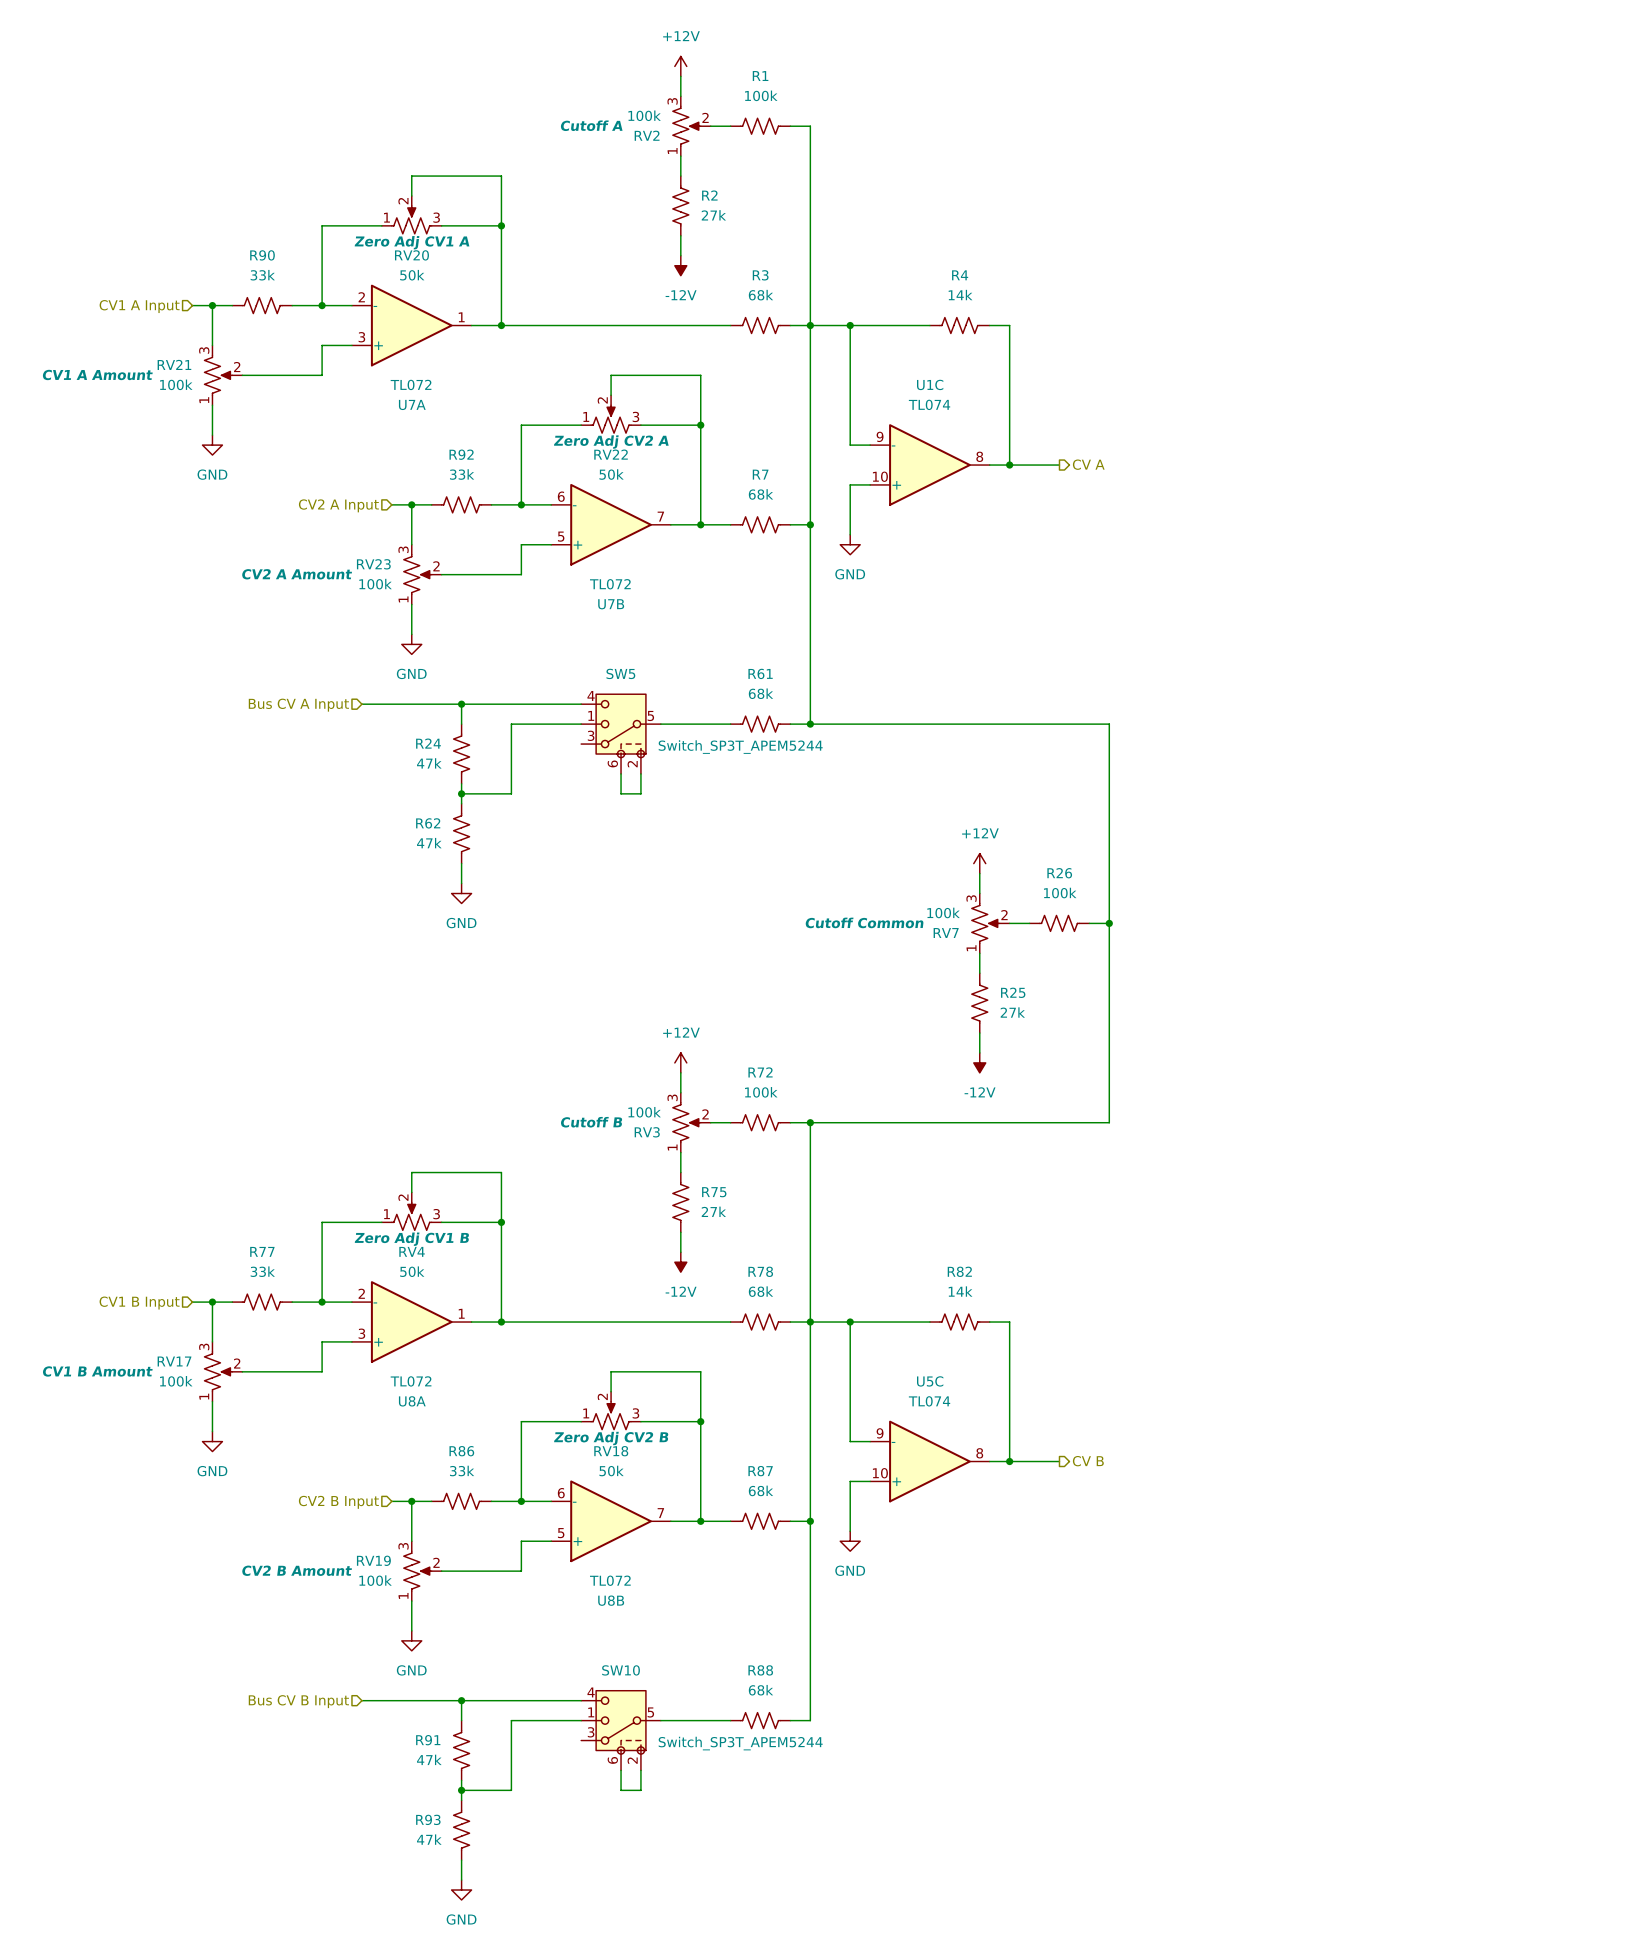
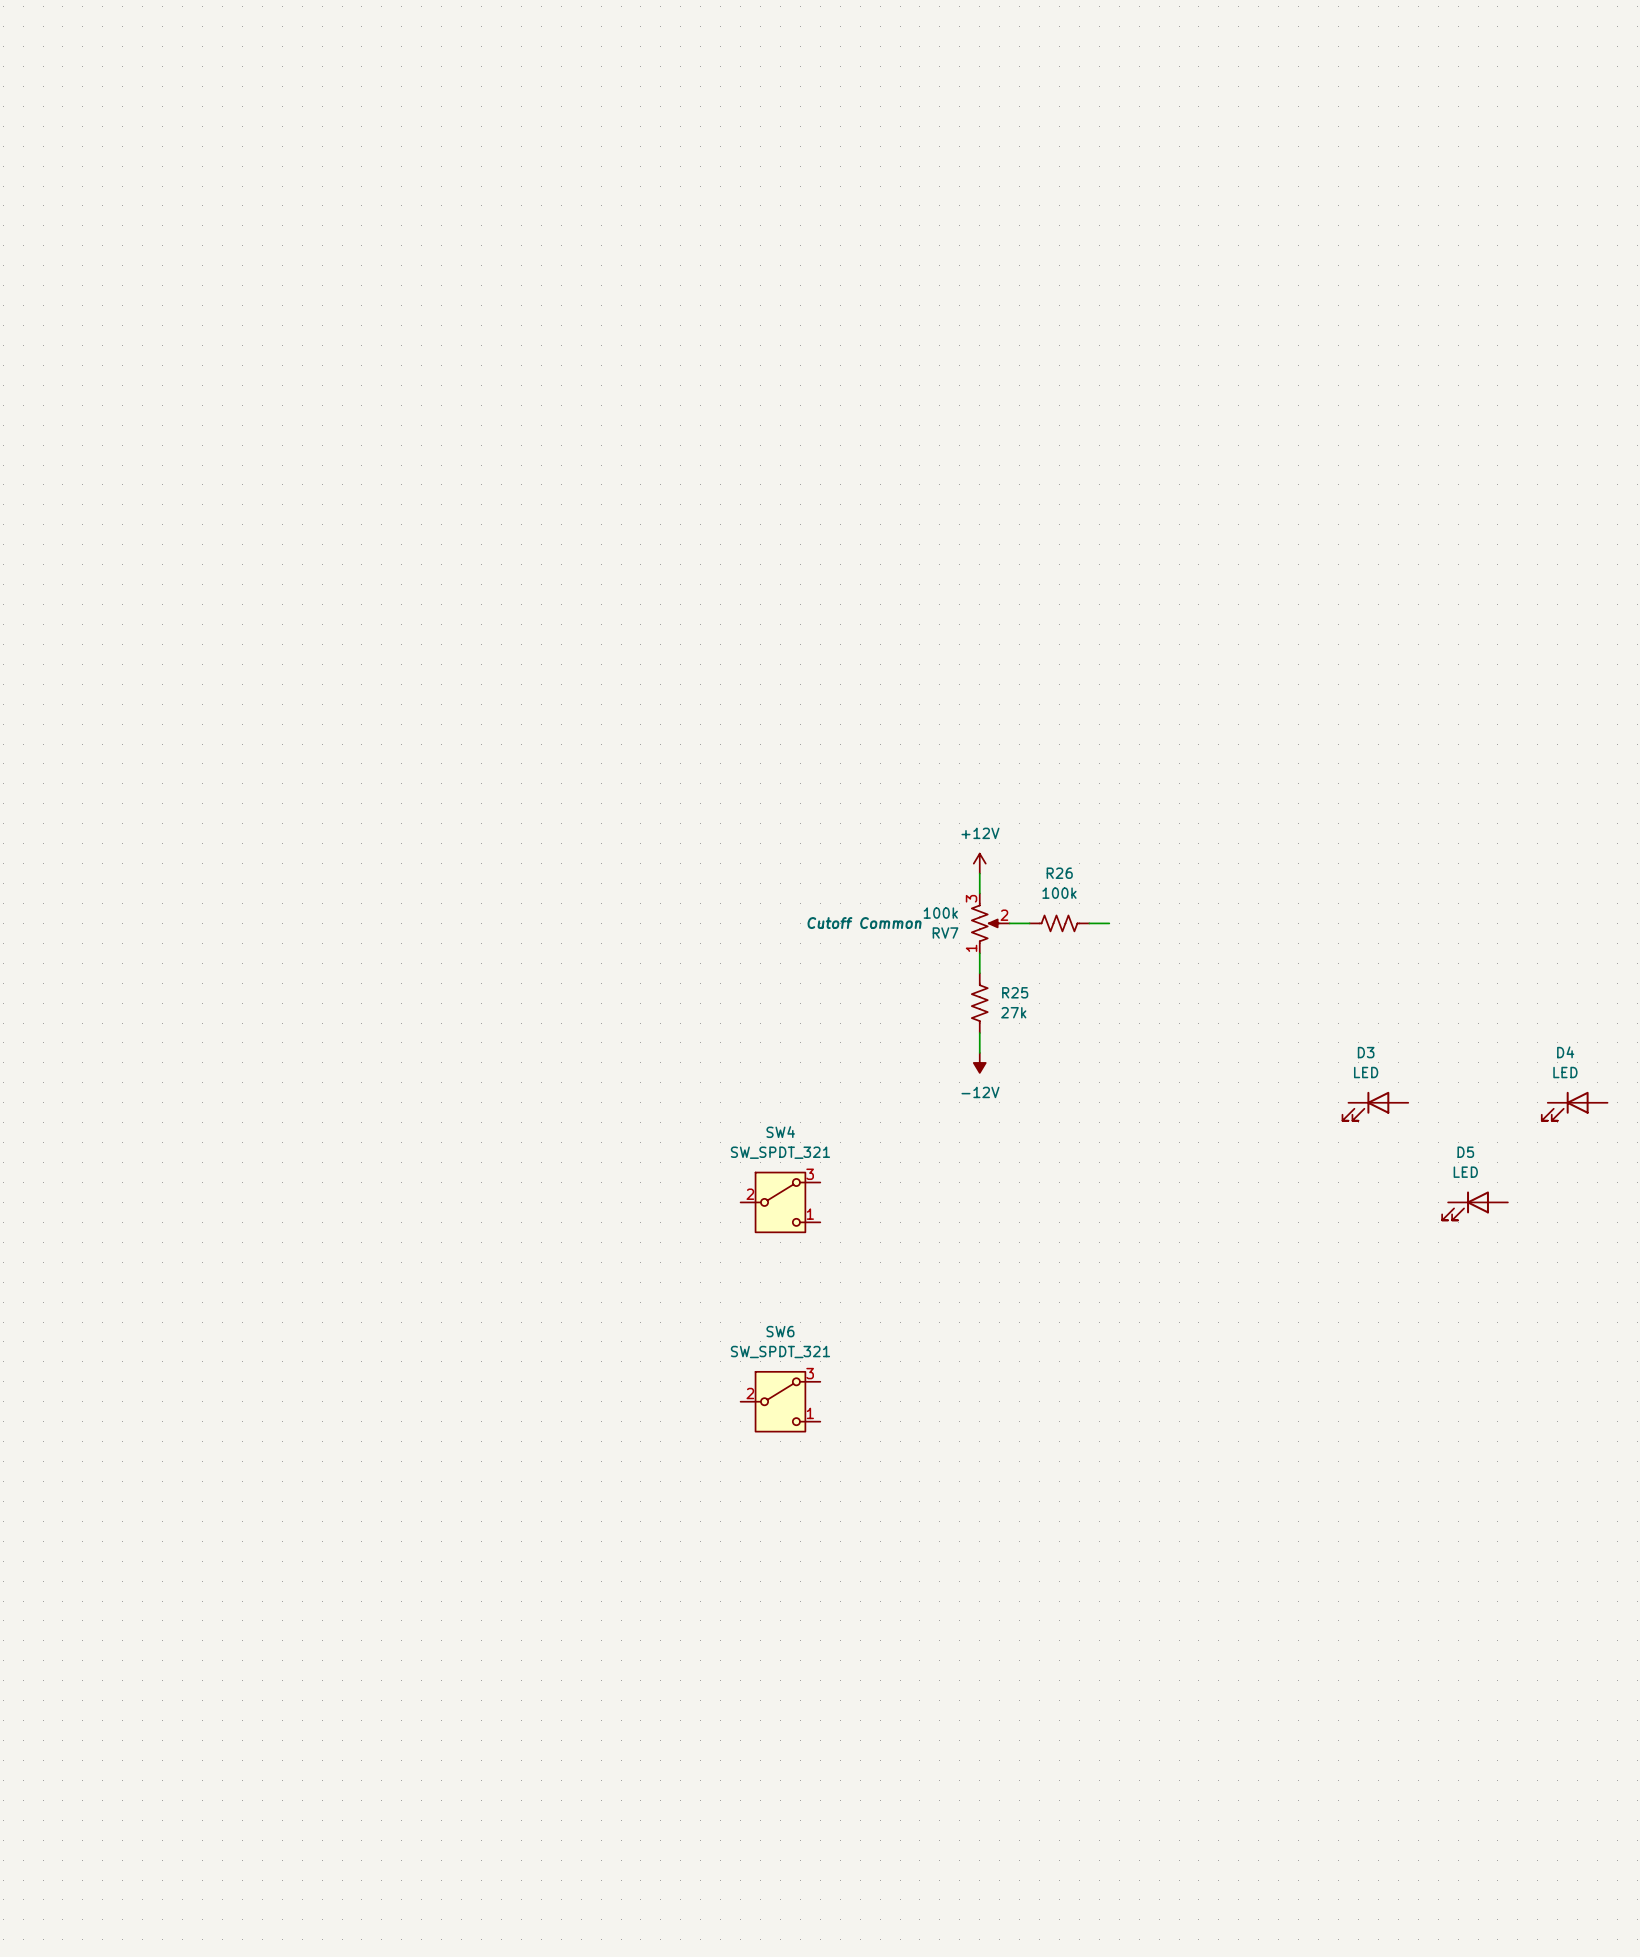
power symbol: +12V (680, 66) -> none
wire: (680, 76) (680, 96) -> none
RV2: 100k (691, 126) -> none
wire: (710, 126) (730, 126) -> none
R1: 100k (760, 126) -> none
wire: (790, 126) (810, 126) (810, 724) -> none
wire: (680, 156) (680, 176) -> none
wire: (411, 195) (411, 176) (501, 176) (501, 325) -> none
R2: 27k (680, 205) -> none
RV20: 50k (411, 214) -> none
wire: (381, 225) (322, 225) (322, 305) -> none
wire: (441, 225) (501, 225) -> none
junction: (501, 225) -> none
wire: (680, 235) (680, 255) -> none
power symbol: -12V (680, 265) -> none
wire: (192, 305) (232, 305) -> none
wire: (212, 305) (212, 345) -> none
junction: (212, 305) -> none
R90: 33k (262, 305) -> none
wire: (292, 305) (351, 305) -> none
junction: (322, 305) -> none
hierarchical label: CV1 A Input (139, 306) -> none
U7A: TL072 (411, 325) -> none
wire: (471, 325) (730, 325) -> none
junction: (501, 325) -> none
R3: 68k (760, 325) -> none
wire: (790, 325) (929, 325) -> none
junction: (810, 325) -> none
wire: (850, 325) (850, 445) (870, 445) -> none
junction: (850, 325) -> none
R4: 14k (959, 325) -> none
wire: (989, 325) (1009, 325) (1009, 465) -> none
wire: (351, 345) (322, 345) (322, 375) (242, 375) -> none
RV21: 100k (223, 375) -> none
wire: (611, 395) (611, 375) (700, 375) (700, 524) -> none
wire: (212, 405) (212, 435) -> none
RV22: 50k (611, 414) -> none
wire: (581, 425) (521, 425) (521, 504) -> none
wire: (640, 425) (700, 425) -> none
junction: (700, 425) -> none
power symbol: GND (212, 445) -> none
hierarchical label: CV A (1088, 464) -> none
U1C: TL074 (929, 465) -> none
wire: (989, 465) (1059, 465) -> none
junction: (1009, 465) -> none
wire: (870, 484) (850, 484) (850, 534) -> none
wire: (391, 504) (431, 504) -> none
wire: (411, 504) (411, 544) -> none
junction: (411, 504) -> none
R92: 33k (461, 504) -> none
wire: (491, 504) (551, 504) -> none
junction: (521, 504) -> none
hierarchical label: CV2 A Input (338, 505) -> none
U7B: TL072 (611, 524) -> none
wire: (670, 524) (730, 524) -> none
junction: (700, 524) -> none
R7: 68k (760, 524) -> none
wire: (790, 524) (810, 524) -> none
junction: (810, 524) -> none
wire: (551, 544) (521, 544) (521, 574) (441, 574) -> none
power symbol: GND (850, 544) -> none
RV23: 100k (422, 574) -> none
wire: (411, 604) (411, 634) -> none
power symbol: GND (411, 644) -> none
wire: (361, 704) (581, 704) -> none
wire: (461, 704) (461, 724) -> none
junction: (461, 704) -> none
hierarchical label: Bus CV A Input (298, 705) -> none
wire: (581, 724) (511, 724) (511, 793) (461, 793) -> none
wire: (660, 724) (730, 724) -> none
R61: 68k (760, 724) -> none
wire: (790, 724) (1109, 724) (1109, 1122) (790, 1122) -> none
junction: (810, 724) -> none
SW5: Switch_SP3T_APEM5244 (621, 734) -> none
R24: 47k (461, 754) -> none
wire: (621, 773) (621, 793) (640, 793) (640, 773) -> none
wire: (461, 783) (461, 803) -> none
junction: (461, 793) -> none
R62: 47k (461, 833) -> none
wire: (461, 863) (461, 883) -> none
power symbol: GND (461, 893) -> none
junction: (1109, 923) -> none
power symbol: +12V (680, 1062) -> none
wire: (680, 1072) (680, 1092) -> none
D3: none -> LED (1375, 1106)
D4: none -> LED (1574, 1106)
RV3: 100k (691, 1122) -> none
wire: (710, 1122) (730, 1122) -> none
R72: 100k (760, 1122) -> none
wire: (810, 1122) (810, 1720) (790, 1720) -> none
junction: (810, 1122) -> none
wire: (680, 1152) (680, 1172) -> none
wire: (411, 1192) (411, 1172) (501, 1172) (501, 1322) -> none
R75: 27k (680, 1202) -> none
SW4: none -> SW_SPDT_321 (780, 1202)
D5: none -> LED (1475, 1205)
RV4: 50k (411, 1211) -> none
wire: (381, 1222) (322, 1222) (322, 1302) -> none
wire: (441, 1222) (501, 1222) -> none
junction: (501, 1222) -> none
wire: (680, 1232) (680, 1252) -> none
power symbol: -12V (680, 1262) -> none
wire: (192, 1302) (232, 1302) -> none
wire: (212, 1302) (212, 1341) -> none
junction: (212, 1302) -> none
R77: 33k (262, 1302) -> none
wire: (292, 1302) (351, 1302) -> none
junction: (322, 1302) -> none
hierarchical label: CV1 B Input (139, 1303) -> none
U8A: TL072 (411, 1322) -> none
wire: (471, 1322) (730, 1322) -> none
junction: (501, 1322) -> none
R78: 68k (760, 1322) -> none
wire: (790, 1322) (929, 1322) -> none
junction: (810, 1322) -> none
wire: (850, 1322) (850, 1441) (870, 1441) -> none
junction: (850, 1322) -> none
R82: 14k (959, 1322) -> none
wire: (989, 1322) (1009, 1322) (1009, 1461) -> none
wire: (351, 1341) (322, 1341) (322, 1371) (242, 1371) -> none
RV17: 100k (223, 1371) -> none
wire: (611, 1391) (611, 1371) (700, 1371) (700, 1521) -> none
wire: (212, 1401) (212, 1431) -> none
SW6: none -> SW_SPDT_321 (780, 1401)
RV18: 50k (611, 1410) -> none
wire: (581, 1421) (521, 1421) (521, 1501) -> none
wire: (640, 1421) (700, 1421) -> none
junction: (700, 1421) -> none
power symbol: GND (212, 1441) -> none
U5C: TL074 (929, 1461) -> none
wire: (989, 1461) (1059, 1461) -> none
junction: (1009, 1461) -> none
hierarchical label: CV B (1088, 1461) -> none
wire: (870, 1481) (850, 1481) (850, 1531) -> none
wire: (391, 1501) (431, 1501) -> none
wire: (411, 1501) (411, 1541) -> none
junction: (411, 1501) -> none
R86: 33k (461, 1501) -> none
wire: (491, 1501) (551, 1501) -> none
junction: (521, 1501) -> none
hierarchical label: CV2 B Input (338, 1502) -> none
U8B: TL072 (611, 1521) -> none
wire: (670, 1521) (730, 1521) -> none
junction: (700, 1521) -> none
R87: 68k (760, 1521) -> none
wire: (790, 1521) (810, 1521) -> none
junction: (810, 1521) -> none
wire: (551, 1541) (521, 1541) (521, 1571) (441, 1571) -> none
power symbol: GND (850, 1541) -> none
RV19: 100k (422, 1571) -> none
wire: (411, 1601) (411, 1630) -> none
power symbol: GND (411, 1640) -> none
wire: (361, 1700) (581, 1700) -> none
wire: (461, 1700) (461, 1720) -> none
junction: (461, 1700) -> none
hierarchical label: Bus CV B Input (298, 1701) -> none
wire: (581, 1720) (511, 1720) (511, 1790) (461, 1790) -> none
wire: (660, 1720) (730, 1720) -> none
R88: 68k (760, 1720) -> none
SW10: Switch_SP3T_APEM5244 (621, 1730) -> none
R91: 47k (461, 1750) -> none
wire: (621, 1770) (621, 1790) (640, 1790) (640, 1770) -> none
wire: (461, 1780) (461, 1800) -> none
junction: (461, 1790) -> none
R93: 47k (461, 1830) -> none
wire: (461, 1860) (461, 1880) -> none
power symbol: GND (461, 1890) -> none

